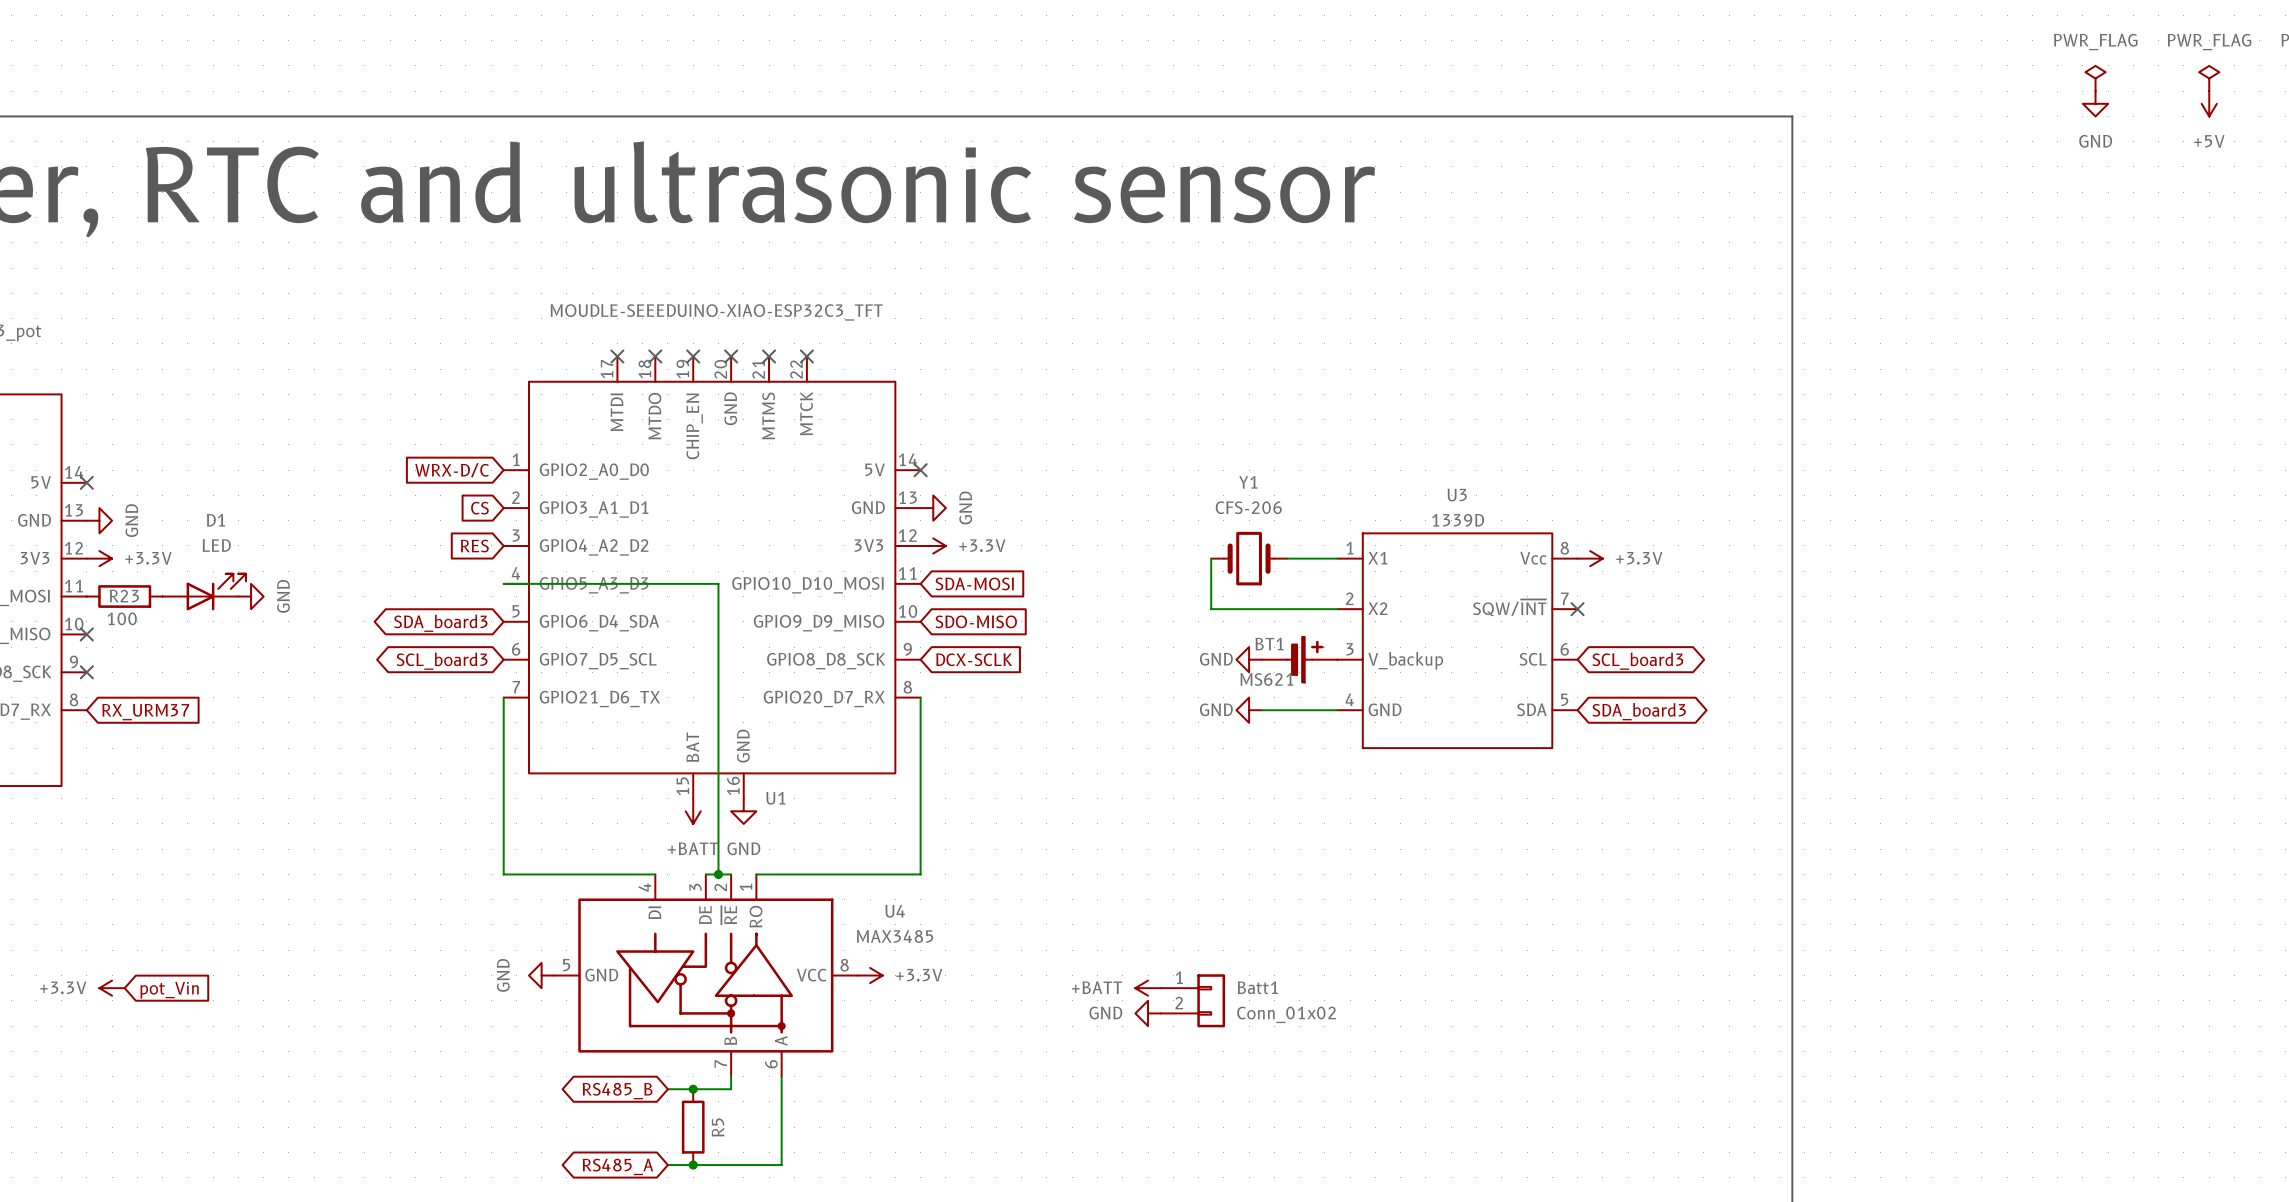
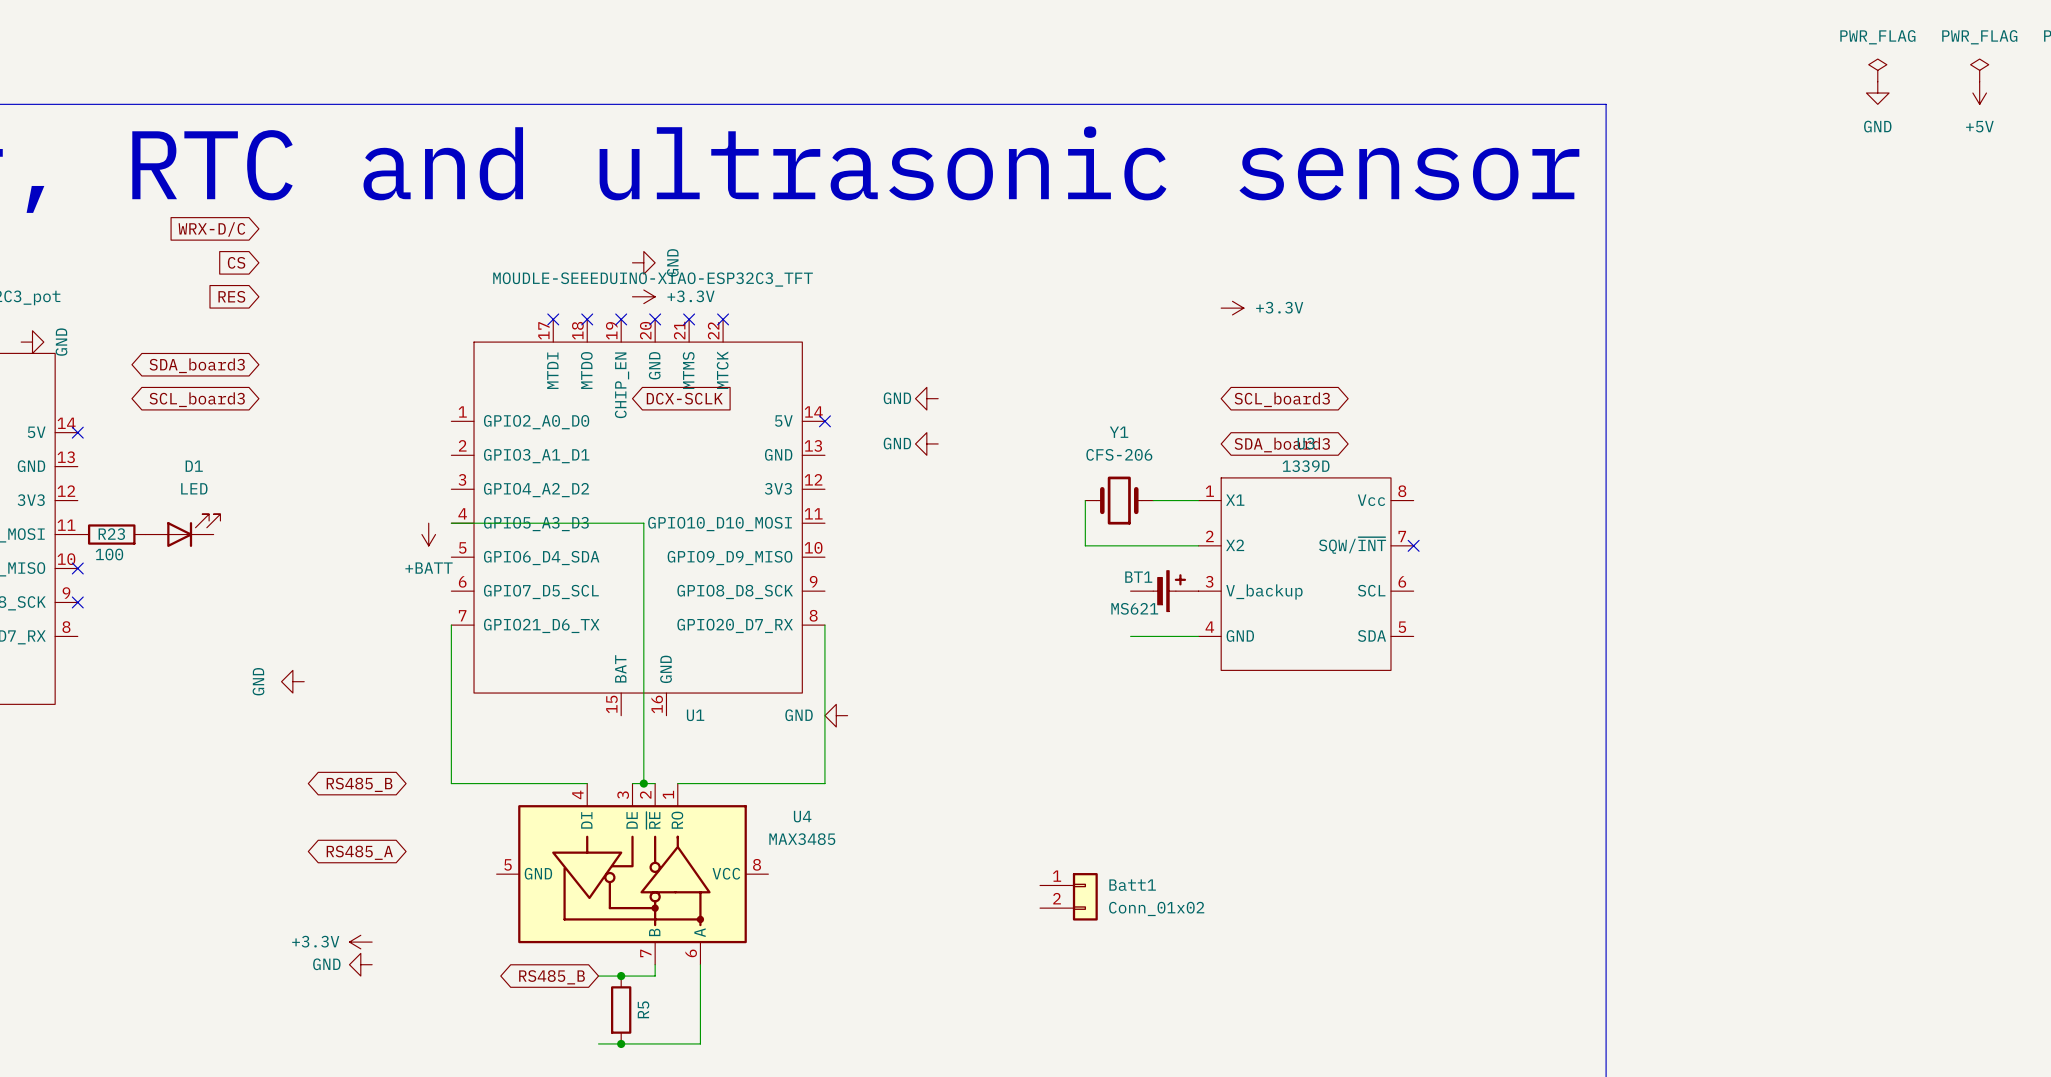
global label: none -> WRX-D/C (211, 229)
global label: none -> CS (236, 262)
power symbol: none -> GND (643, 262)
global label: none -> RES (231, 296)
power symbol: none -> +3.3V (643, 296)
power symbol: none -> +3.3V (1232, 308)
power symbol: none -> GND (32, 342)
global label: none -> SDA_board3 (197, 365)
global label: none -> DCX-SCLK (684, 398)
power symbol: none -> GND (926, 398)
global label: none -> SCL_board3 (197, 399)
global label: none -> SCL_board3 (1282, 399)
global label: WRX-D/C (452, 470) -> none
power symbol: none -> GND (926, 443)
global label: none -> SDA_board3 (1282, 444)
global label: CS (479, 508) -> none
power symbol: GND (933, 508) -> none
power symbol: GND (99, 520) -> none
power symbol: +3.3V (933, 545) -> none
global label: RES (474, 546) -> none
power symbol: +3.3V (99, 558) -> none
power symbol: +3.3V (1590, 558) -> none
global label: SDA-MOSI (974, 583) -> none
power symbol: GND (251, 596) -> none
power symbol: none -> +BATT (428, 534)
global label: SDO-MISO (976, 621) -> none
global label: SDA_board3 (440, 623) -> none
global label: DCX-SCLK (974, 659) -> none
power symbol: GND (1249, 659) -> none
global label: SCL_board3 (442, 661) -> none
global label: SCL_board3 (1637, 661) -> none
power symbol: GND (1249, 710) -> none
global label: SDA_board3 (1639, 711) -> none
global label: RX_URM37 (145, 712) -> none
power symbol: none -> GND (292, 681)
power symbol: none -> GND (836, 715)
power symbol: +BATT (693, 811) -> none
power symbol: GND (743, 811) -> none
global label: none -> RS485_B (359, 784)
global label: none -> RS485_A (359, 852)
power symbol: GND (541, 975) -> none
power symbol: +3.3V (870, 975) -> none
power symbol: +3.3V (112, 988) -> none
power symbol: +BATT (1148, 988) -> none
global label: pot_Vin (169, 990) -> none
power symbol: GND (1148, 1013) -> none
power symbol: none -> +3.3V (360, 942)
power symbol: none -> GND (360, 964)
global label: RS485_A (617, 1166) -> none

